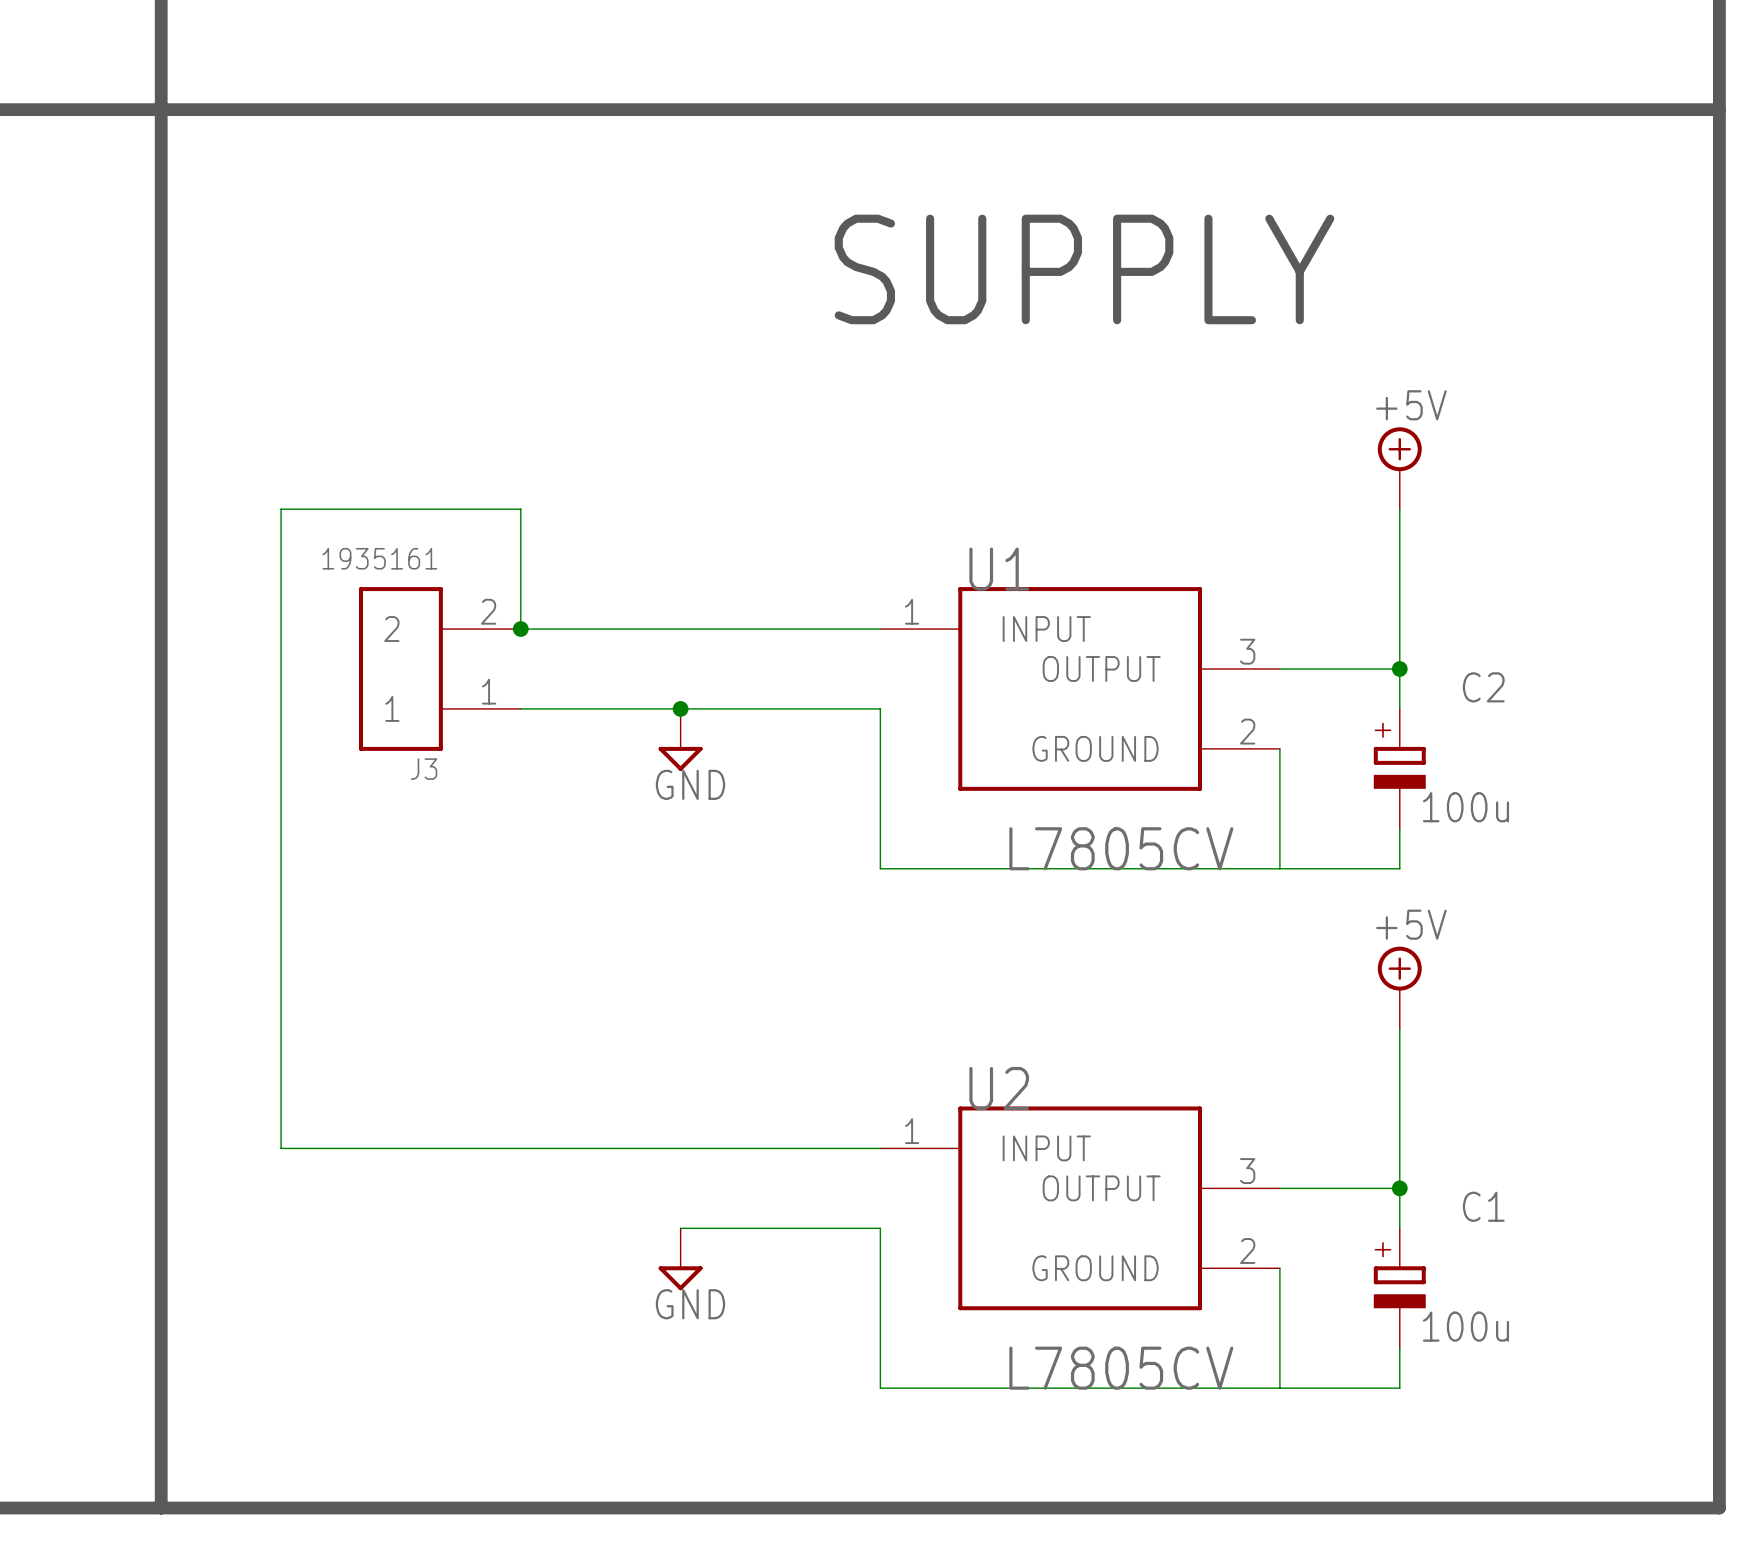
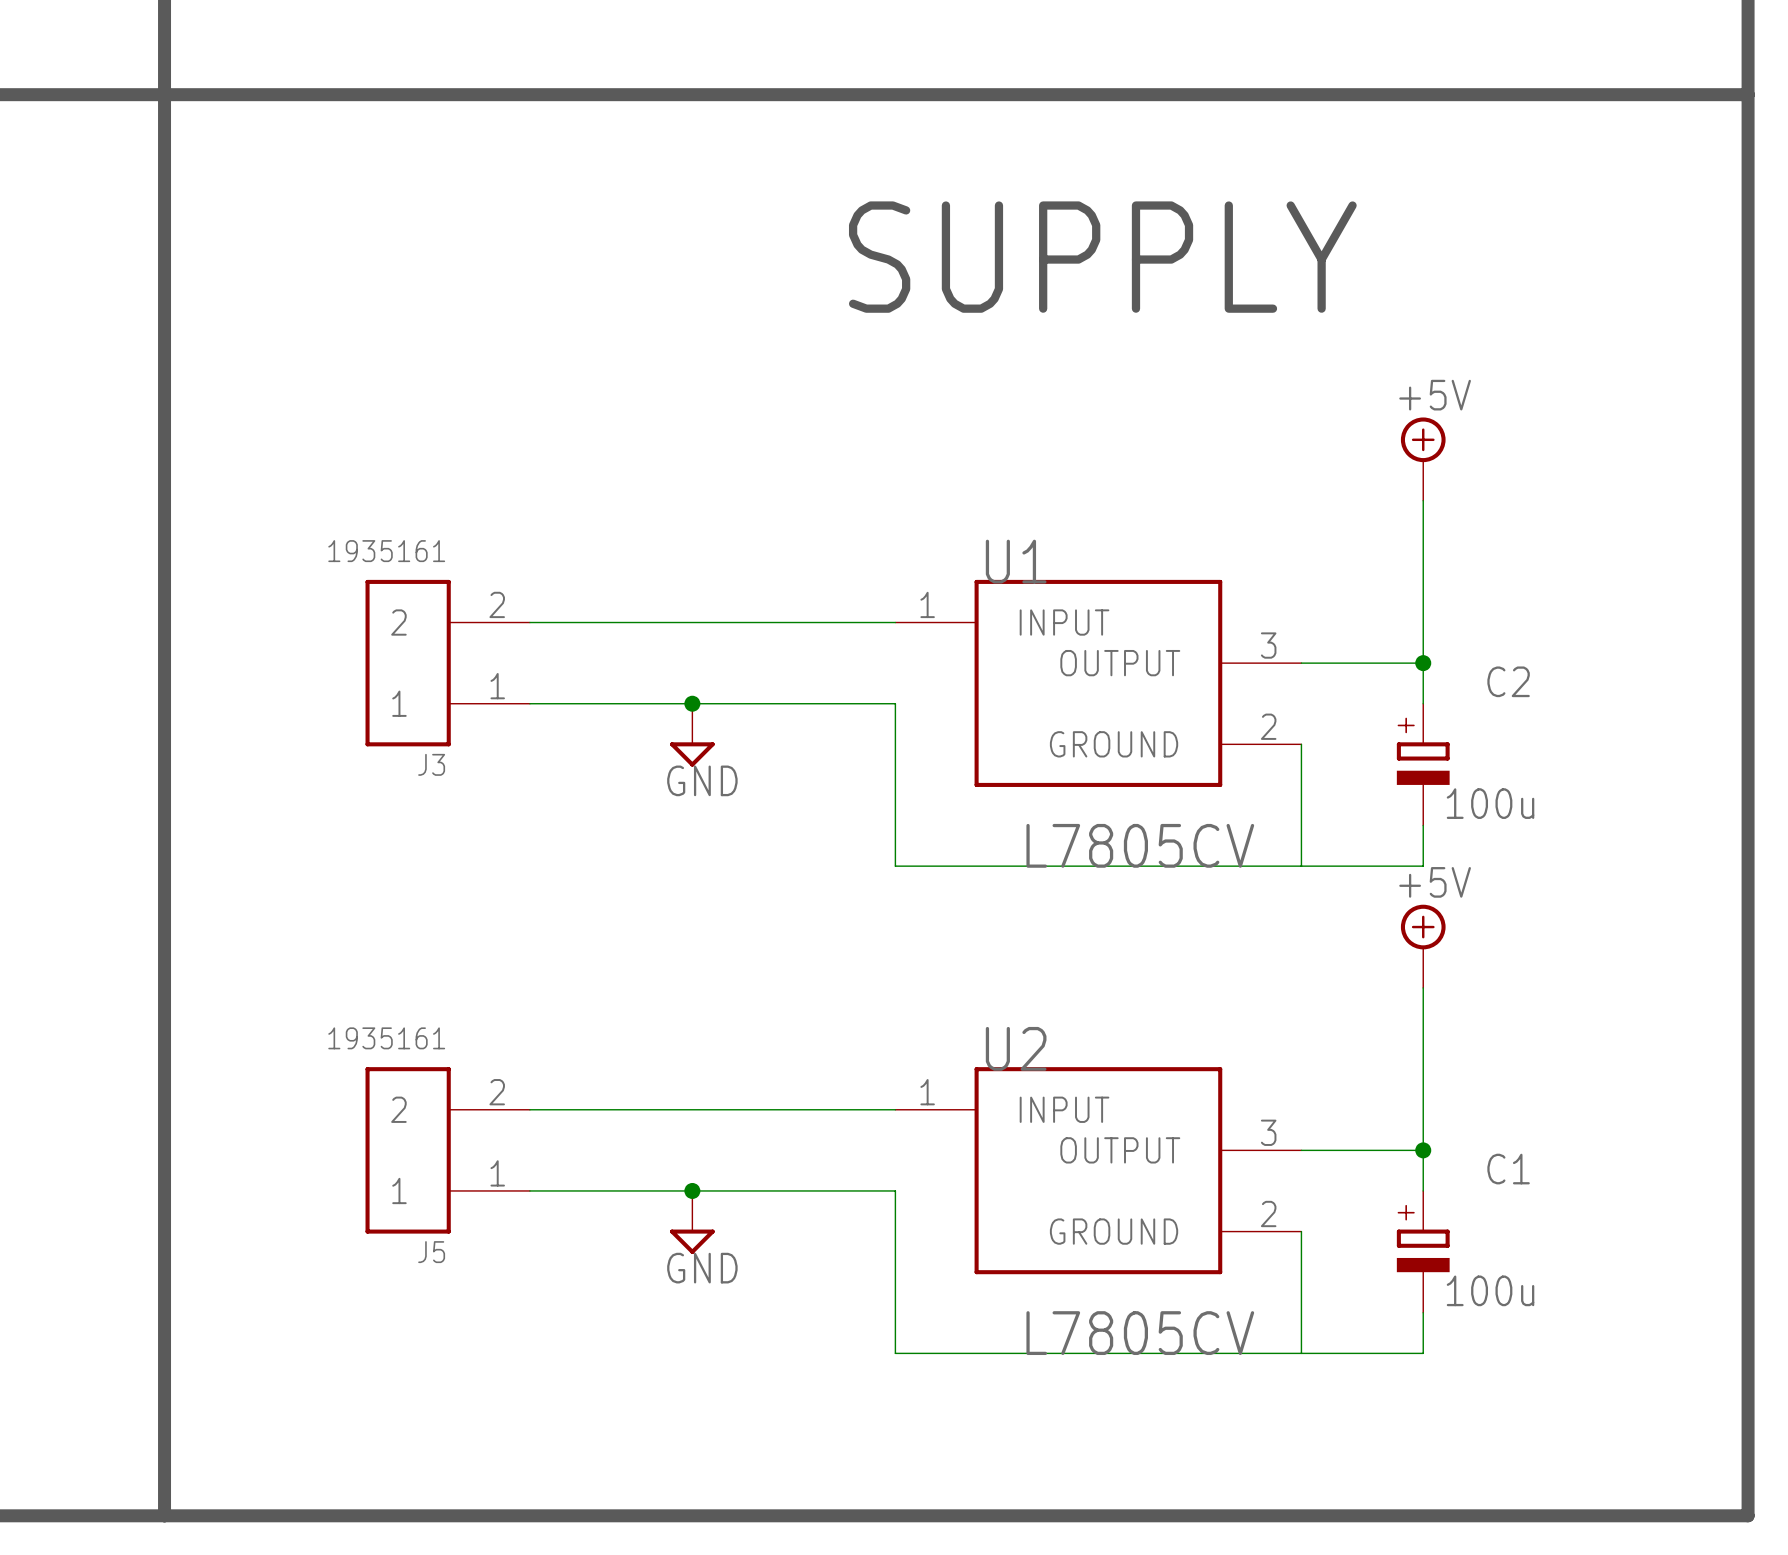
wire: (520, 629) (520, 509) (281, 509) (281, 1148) (880, 1148) -> none
junction: (520, 629) -> none
power symbol position: +5V (1399, 987) -> +5V (1423, 946)
wire: none -> (529, 1109) (895, 1109)
J5: none -> 1935161 (447, 1150)
wire: none -> (1301, 1150) (1423, 1150)
junction: none -> (692, 1190)
wire: (1279, 1188) (1399, 1188) (1399, 1228) -> none
junction position: (1399, 1188) -> (1423, 1150)
U2 position: (1080, 1208) -> (1098, 1170)
wire: (680, 1228) (880, 1228) -> (529, 1190) (895, 1190) (895, 1231)
power symbol position: GND (680, 1259) -> GND (692, 1222)
C1 position: (1399, 1288) -> (1423, 1251)
wire: (880, 1348) (880, 1388) (1399, 1388) (1399, 1348) -> (895, 1353) (1423, 1353) (1423, 1312)
wire: (1279, 1348) (1279, 1388) -> (1301, 1231) (1301, 1272)

